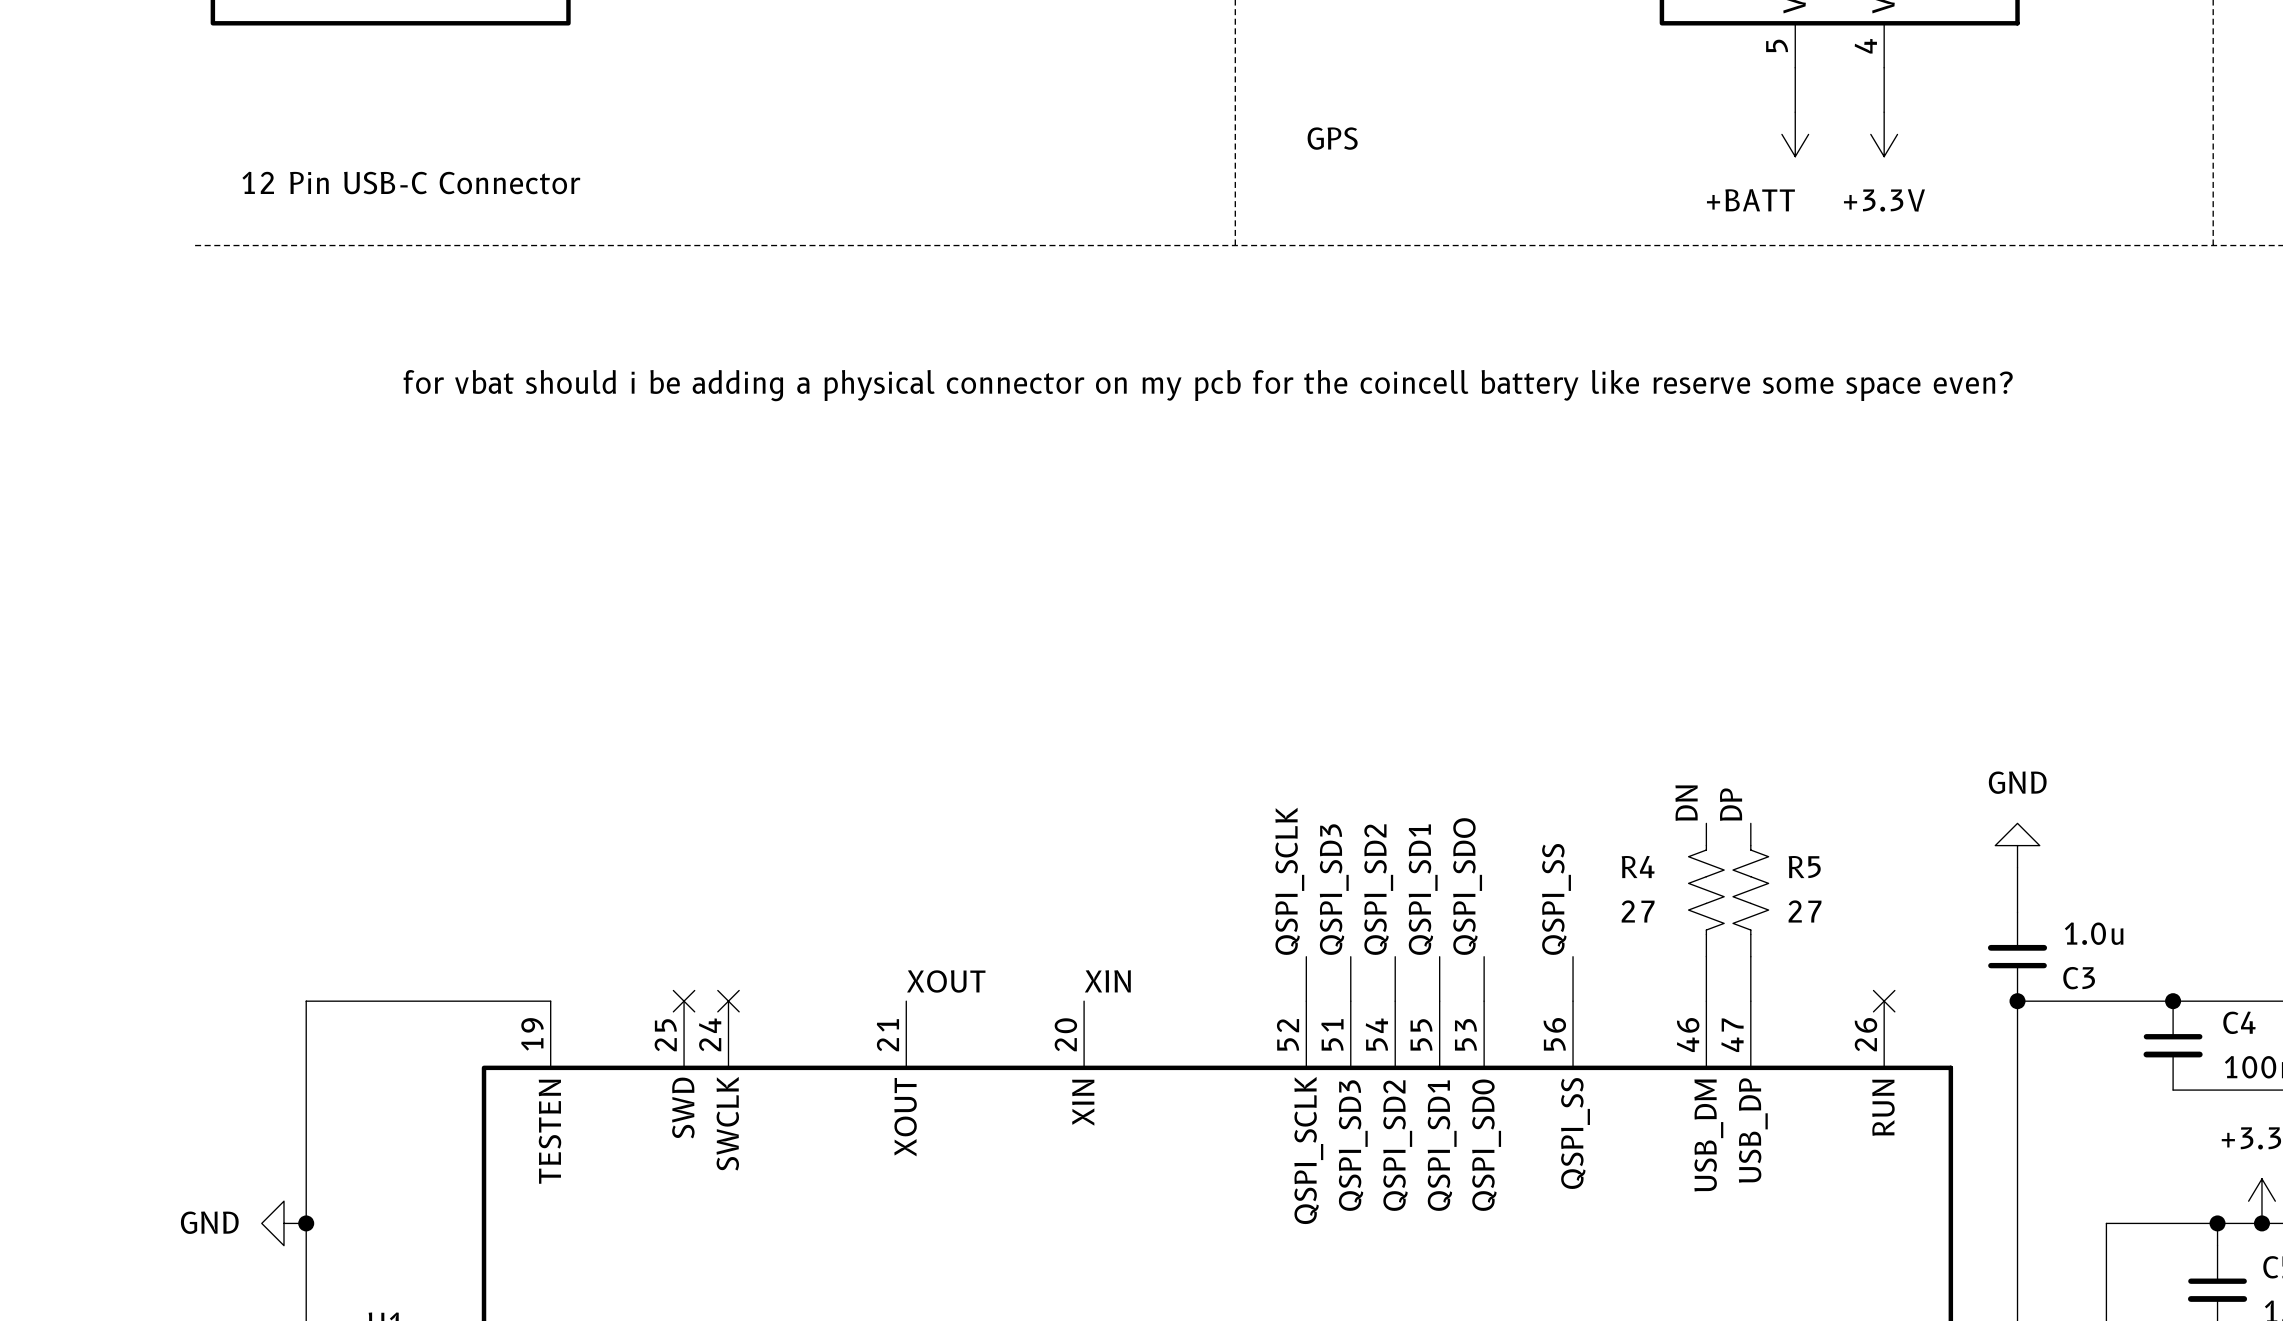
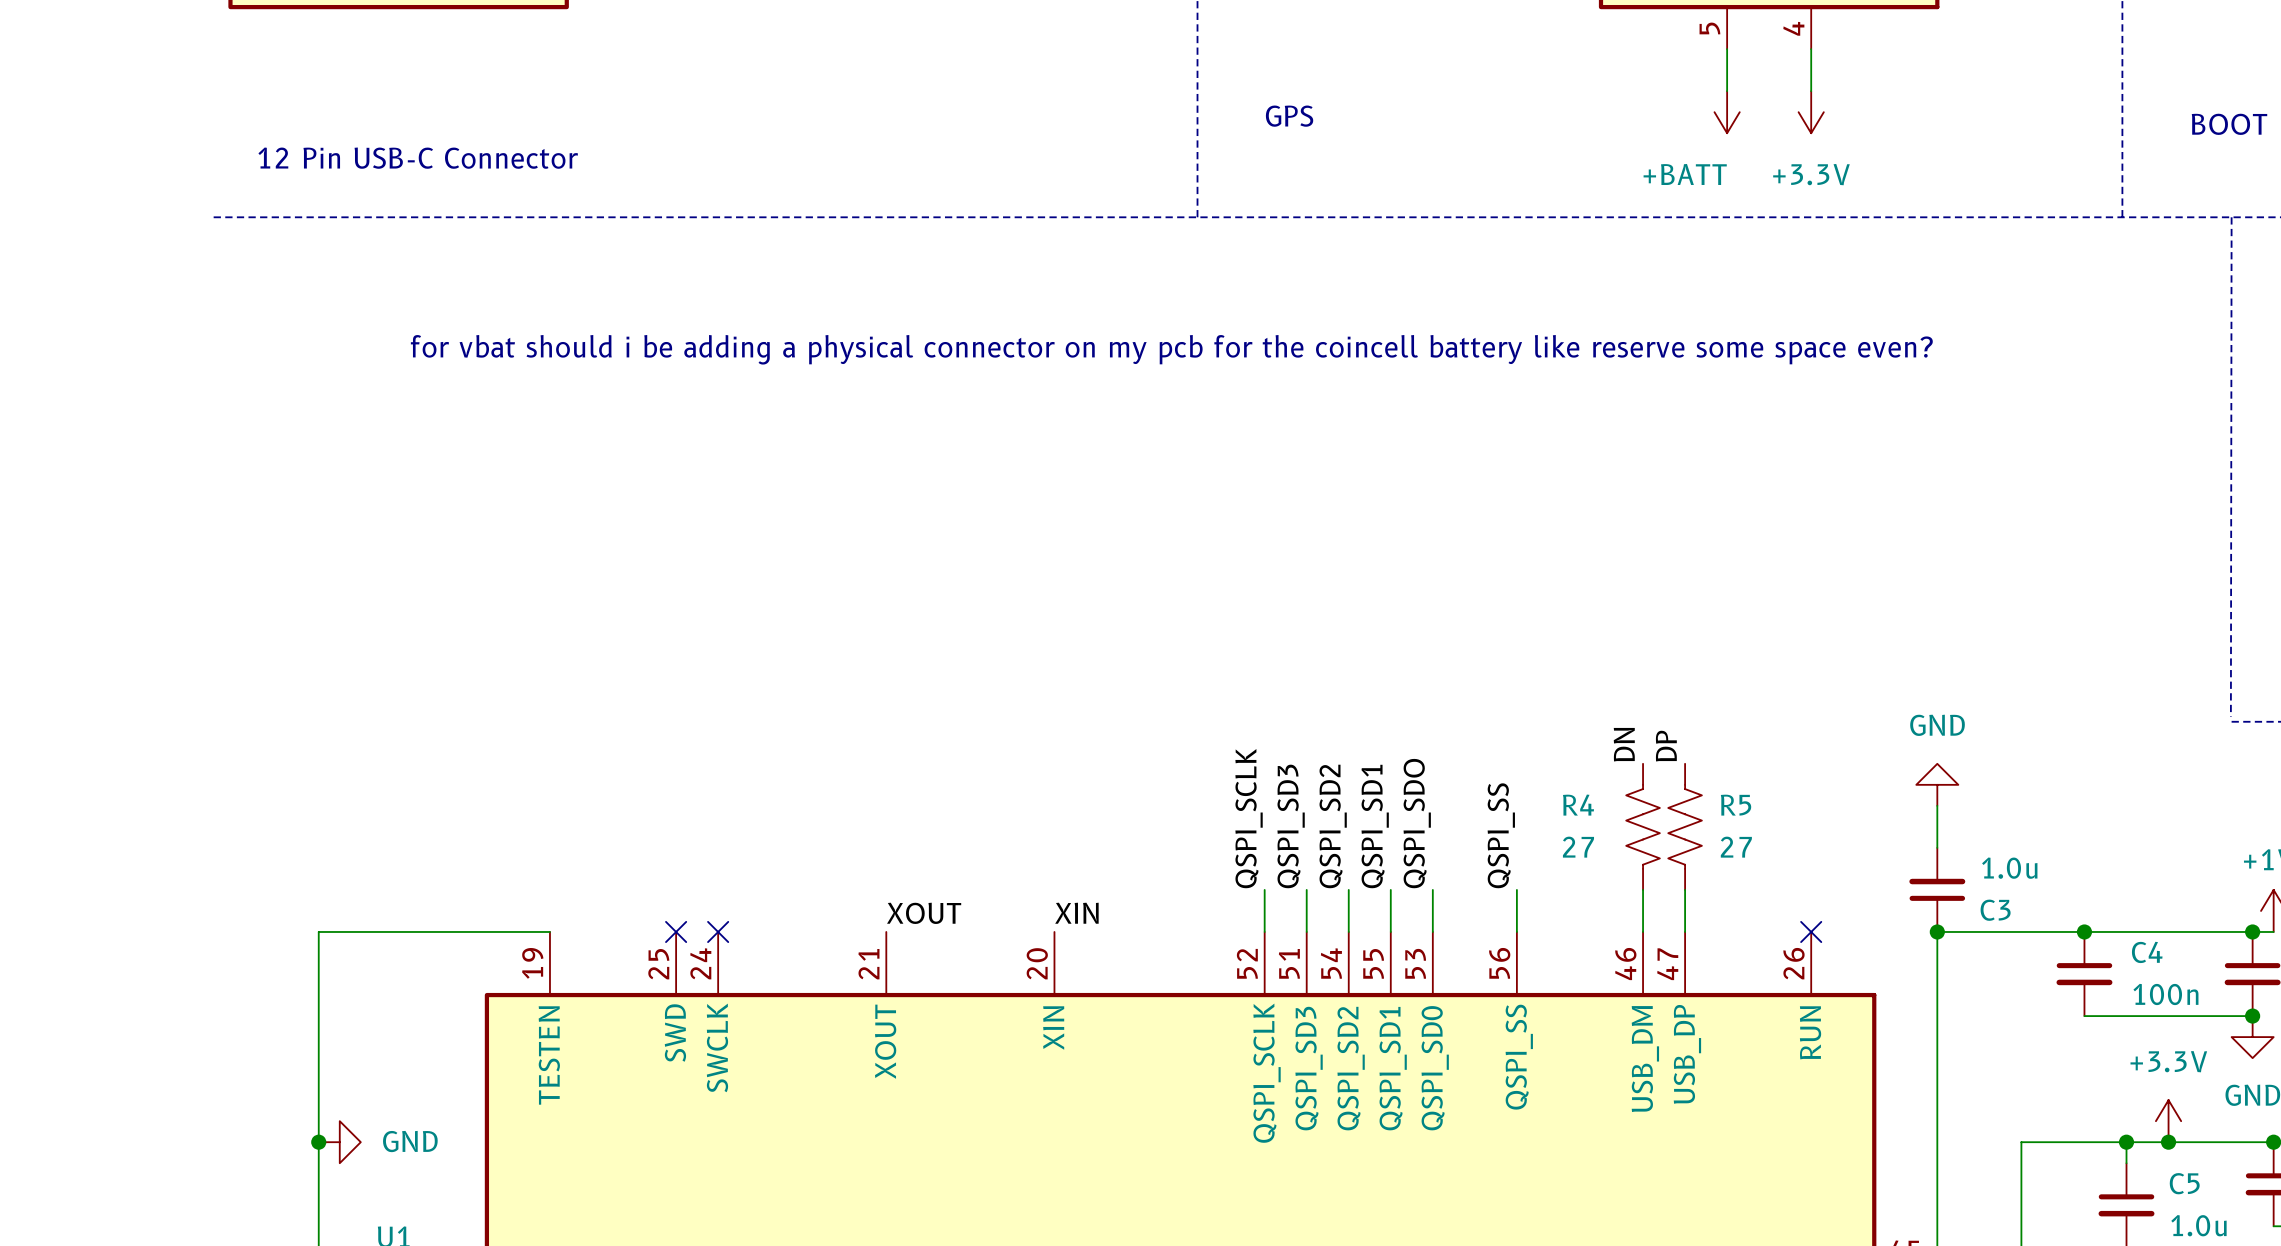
power symbol rotation: 0° (283, 1223) -> 180° (339, 1142)
power symbol position: GND (283, 1223) -> GND (339, 1142)

